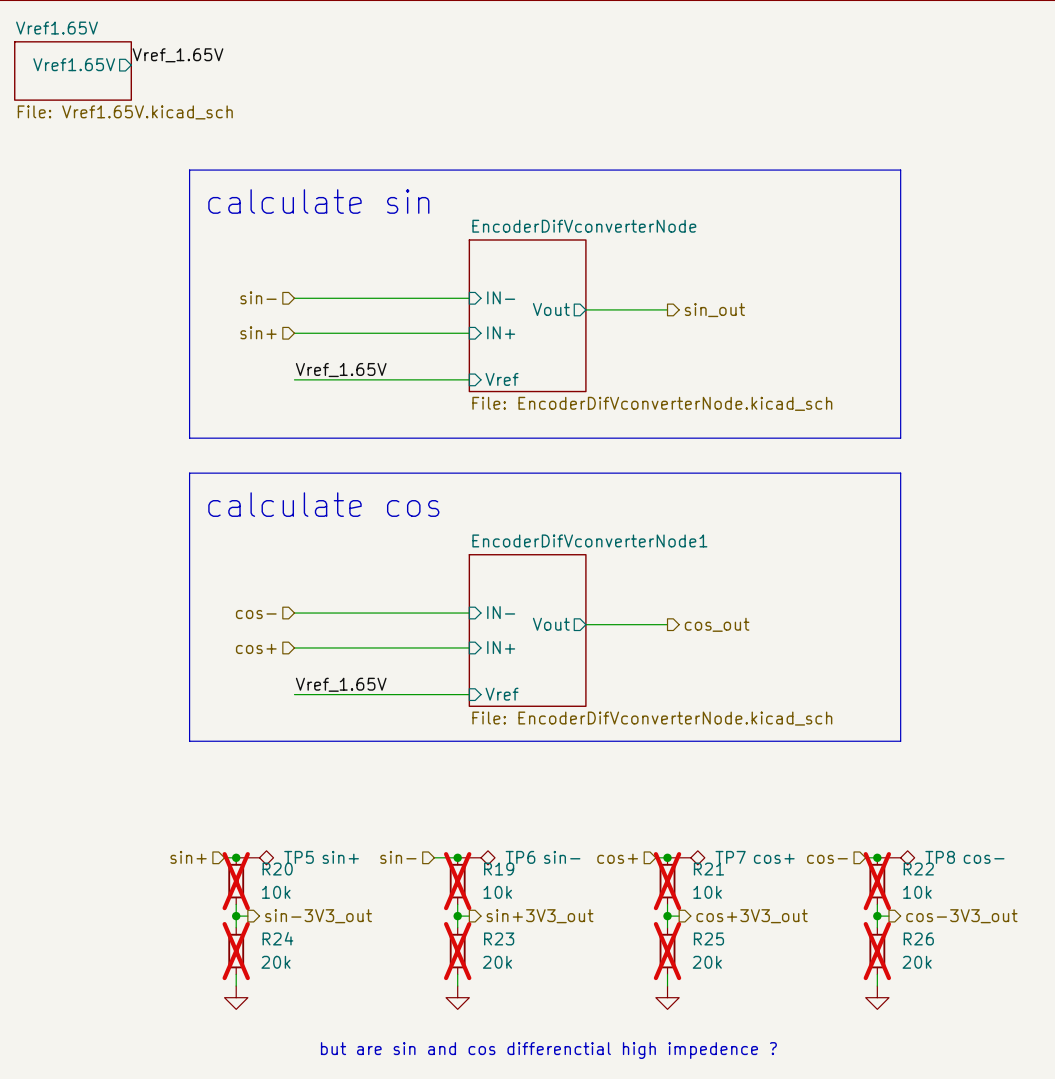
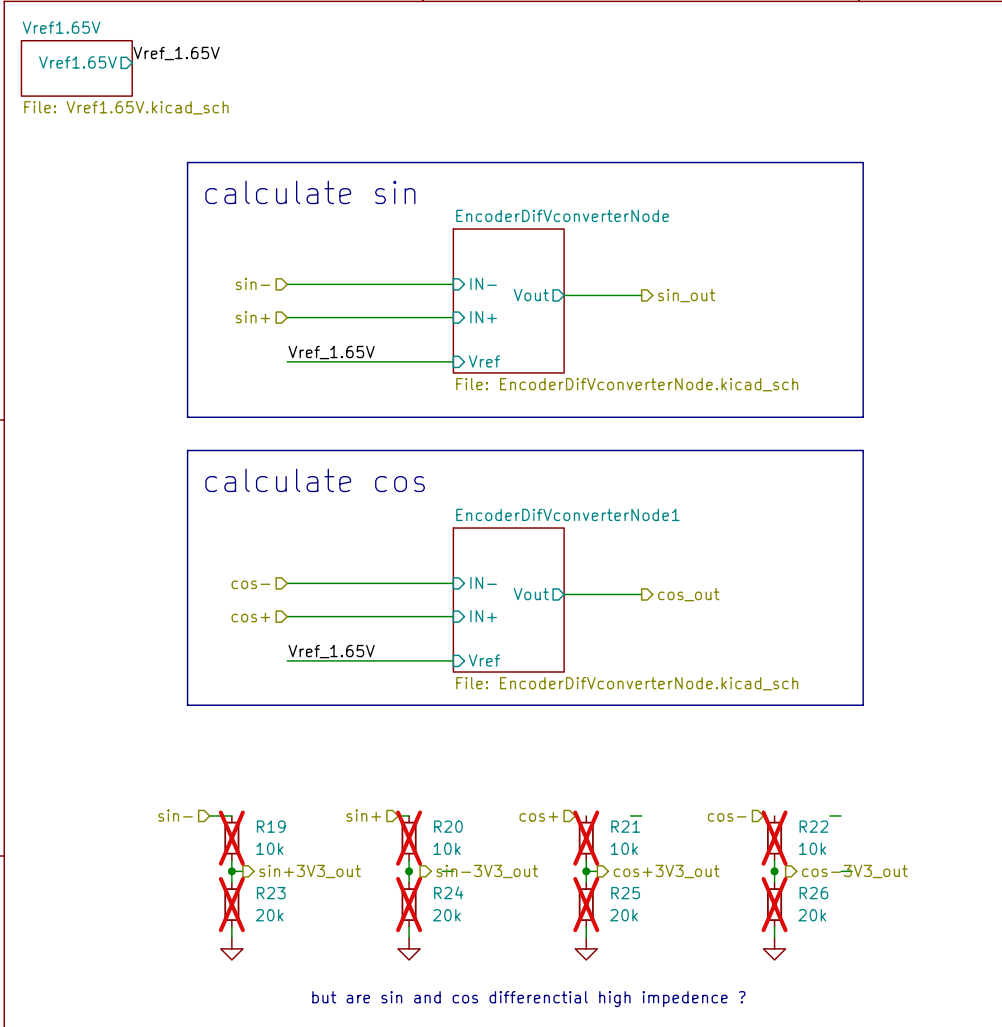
hierarchical label position: sin+ (188, 857) -> sin+ (363, 815)
wire: none -> (209, 815) (220, 815)
junction: (236, 857) -> none
TP5: sin+ (254, 857) -> none
hierarchical label position: sin- (398, 857) -> sin- (175, 815)
wire: none -> (397, 815) (409, 815)
wire: (434, 857) (457, 857) -> none
junction: (457, 857) -> none
TP6: sin- (476, 857) -> none
junction: (667, 857) -> none
TP7: cos+ (686, 857) -> none
junction: (877, 857) -> none
TP8: cos- (895, 857) -> none
hierarchical label position: cos+ (617, 858) -> cos+ (538, 816)
hierarchical label position: cos- (827, 859) -> cos- (727, 817)
R20 name: R20 (277, 869) -> R19 (271, 826)
R20: none -> 10k (409, 838)
R19: 10k (457, 881) -> none
R21 position: (667, 881) -> (586, 838)
R22 position: (877, 881) -> (774, 838)
wire: (457, 904) (457, 927) -> (409, 860) (409, 882)
wire: (667, 904) (667, 927) -> (586, 860) (586, 882)
wire: (877, 904) (877, 927) -> (774, 860) (774, 882)
hierarchical label: sin-3V3_out (318, 916) -> sin+3V3_out (310, 871)
junction: none -> (409, 871)
junction: (457, 916) -> none
hierarchical label: sin+3V3_out (540, 916) -> sin-3V3_out (487, 871)
junction: none -> (586, 871)
junction: (667, 916) -> none
hierarchical label position: cos+3V3_out (752, 916) -> cos+3V3_out (666, 871)
junction: none -> (774, 871)
junction: (877, 916) -> none
hierarchical label position: cos-3V3_out (961, 916) -> cos-3V3_out (854, 871)
R24 name: R24 (277, 938) -> R23 (271, 893)
R24: none -> 20k (409, 904)
R23: 20k (457, 951) -> none
R25 position: (667, 951) -> (586, 904)
R26 position: (877, 951) -> (774, 904)
wire: (457, 974) (457, 986) -> (409, 926) (409, 937)
wire: (667, 974) (667, 986) -> (586, 926) (586, 937)
wire: (877, 974) (877, 986) -> (774, 926) (774, 937)
power symbol position: (457, 997) -> (409, 948)
power symbol position: (667, 997) -> (586, 948)
power symbol: none -> (774, 948)
power symbol: (877, 997) -> none

